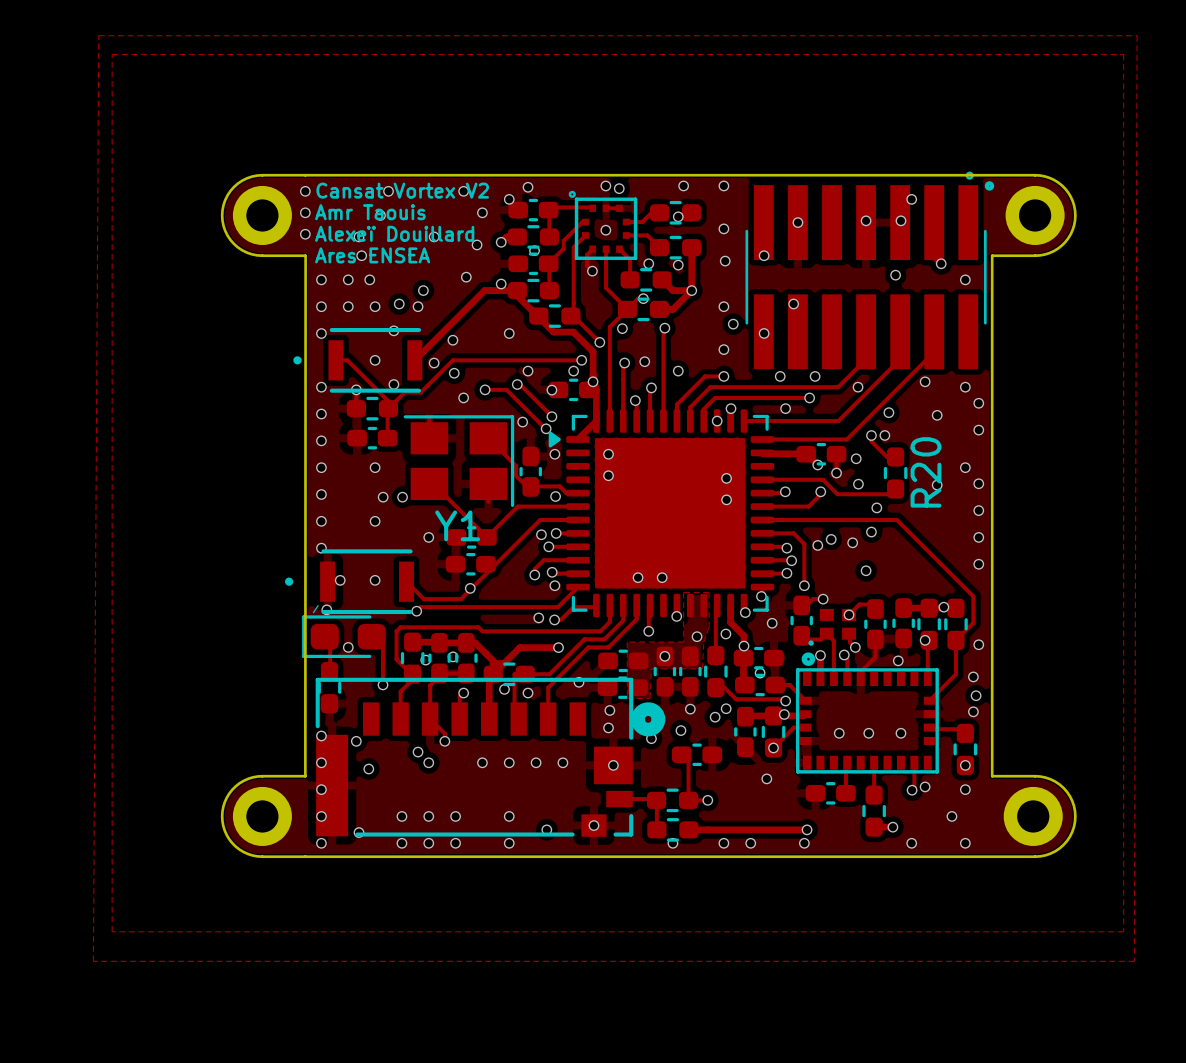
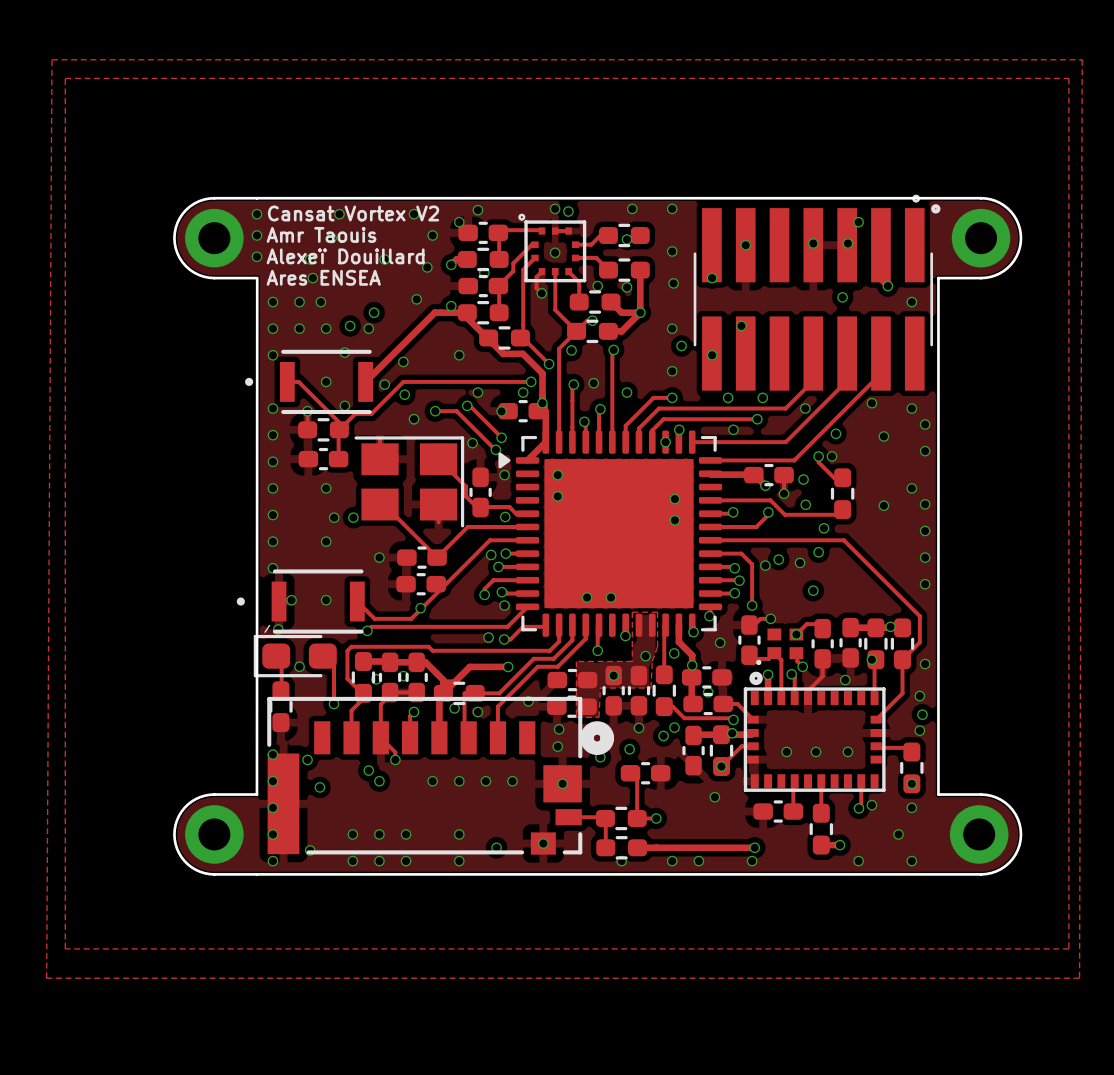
R20 name: R20 (925, 472) -> none
Y1 name: Y1 (457, 525) -> none

